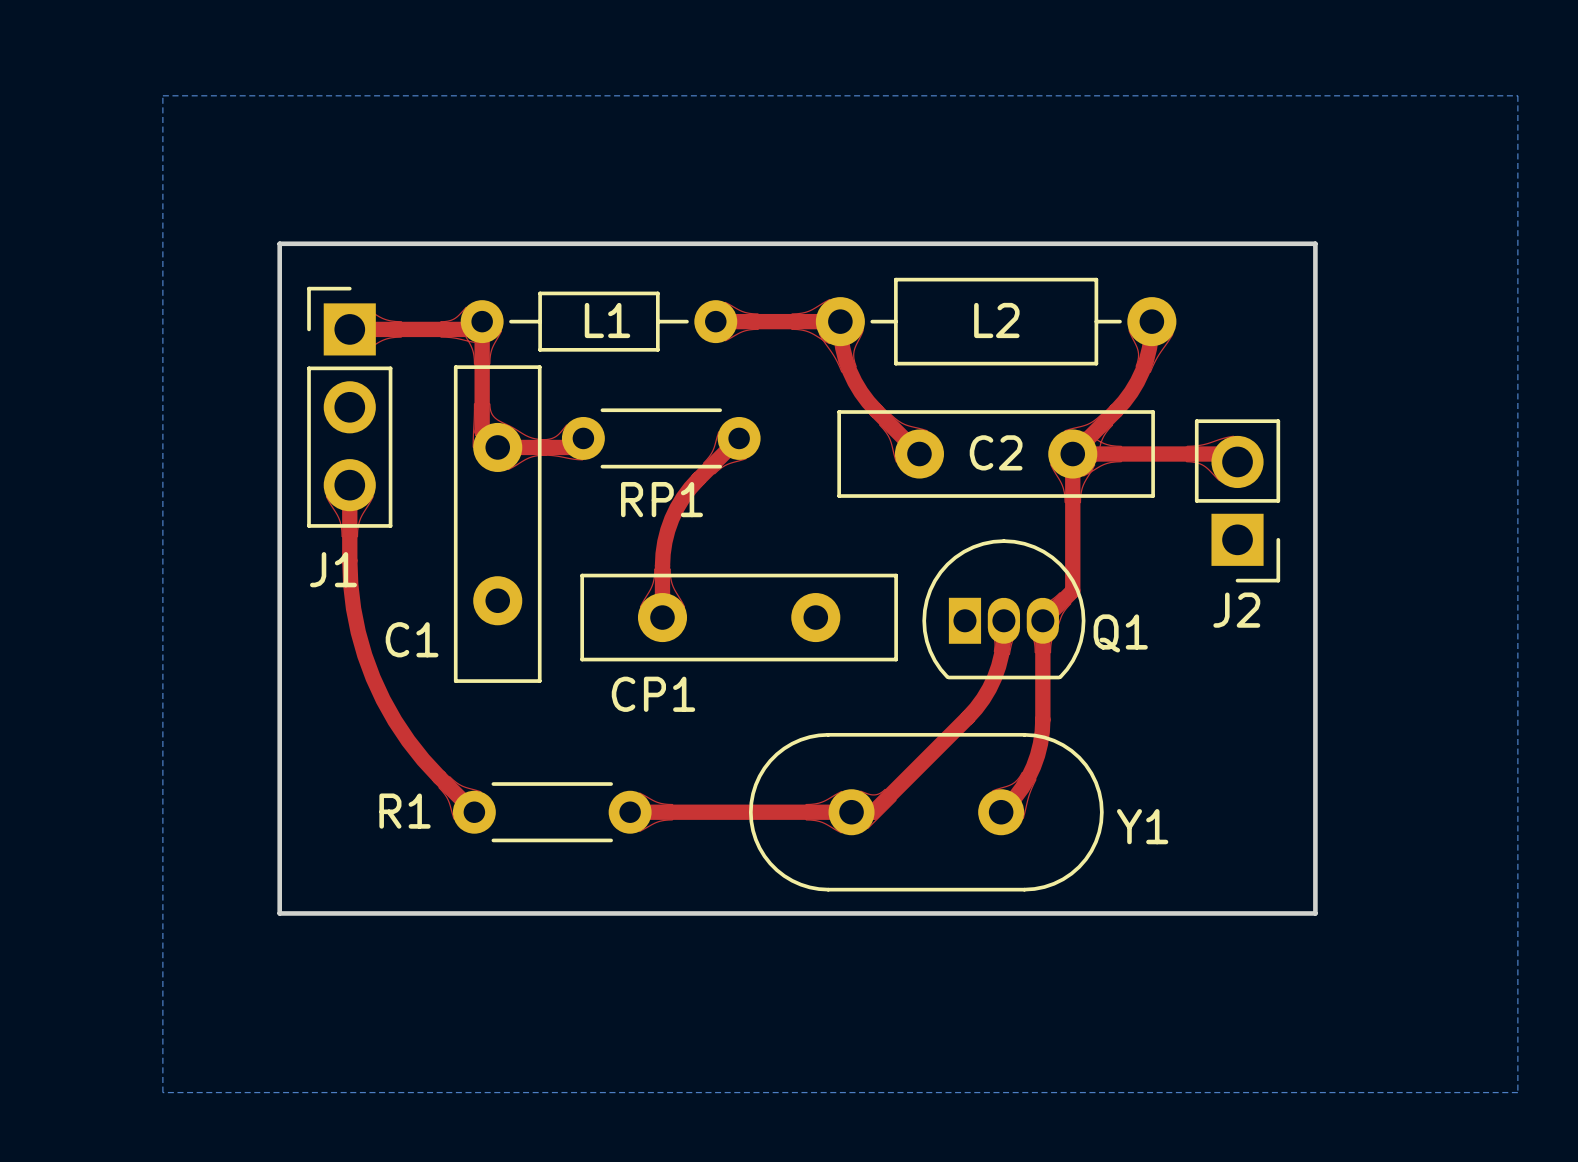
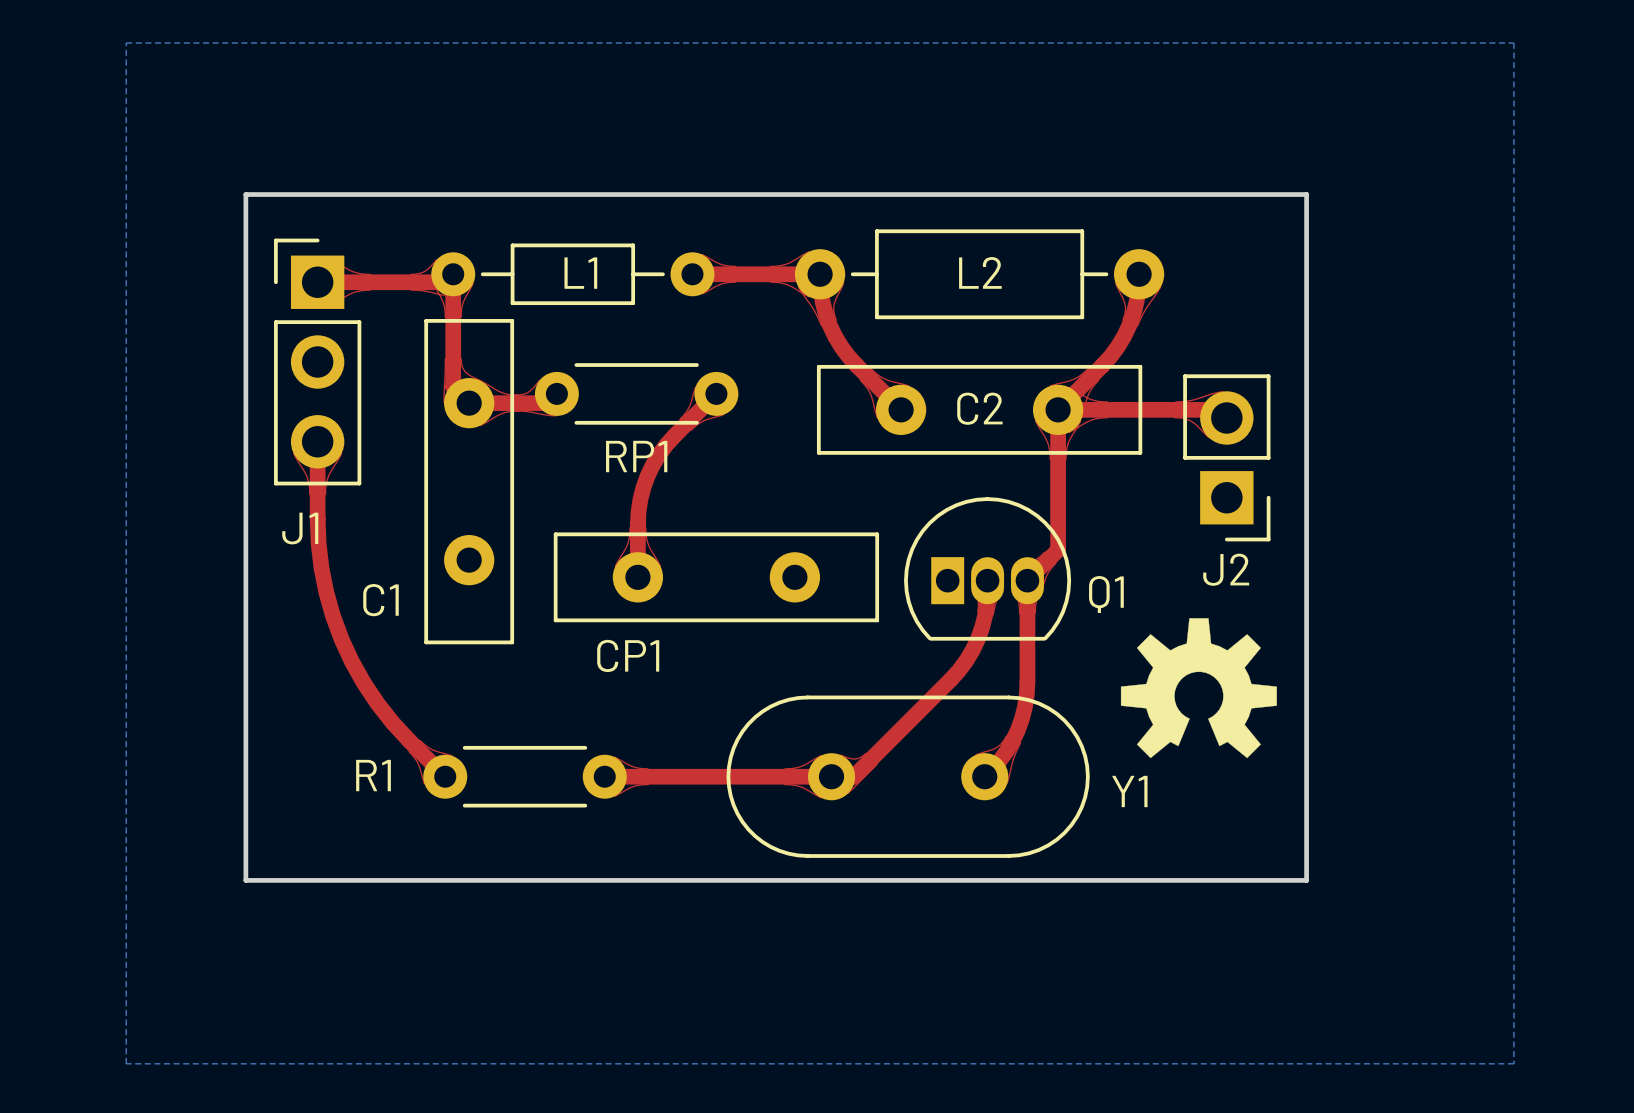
drawing: none -> [1120, 618, 1277, 759]

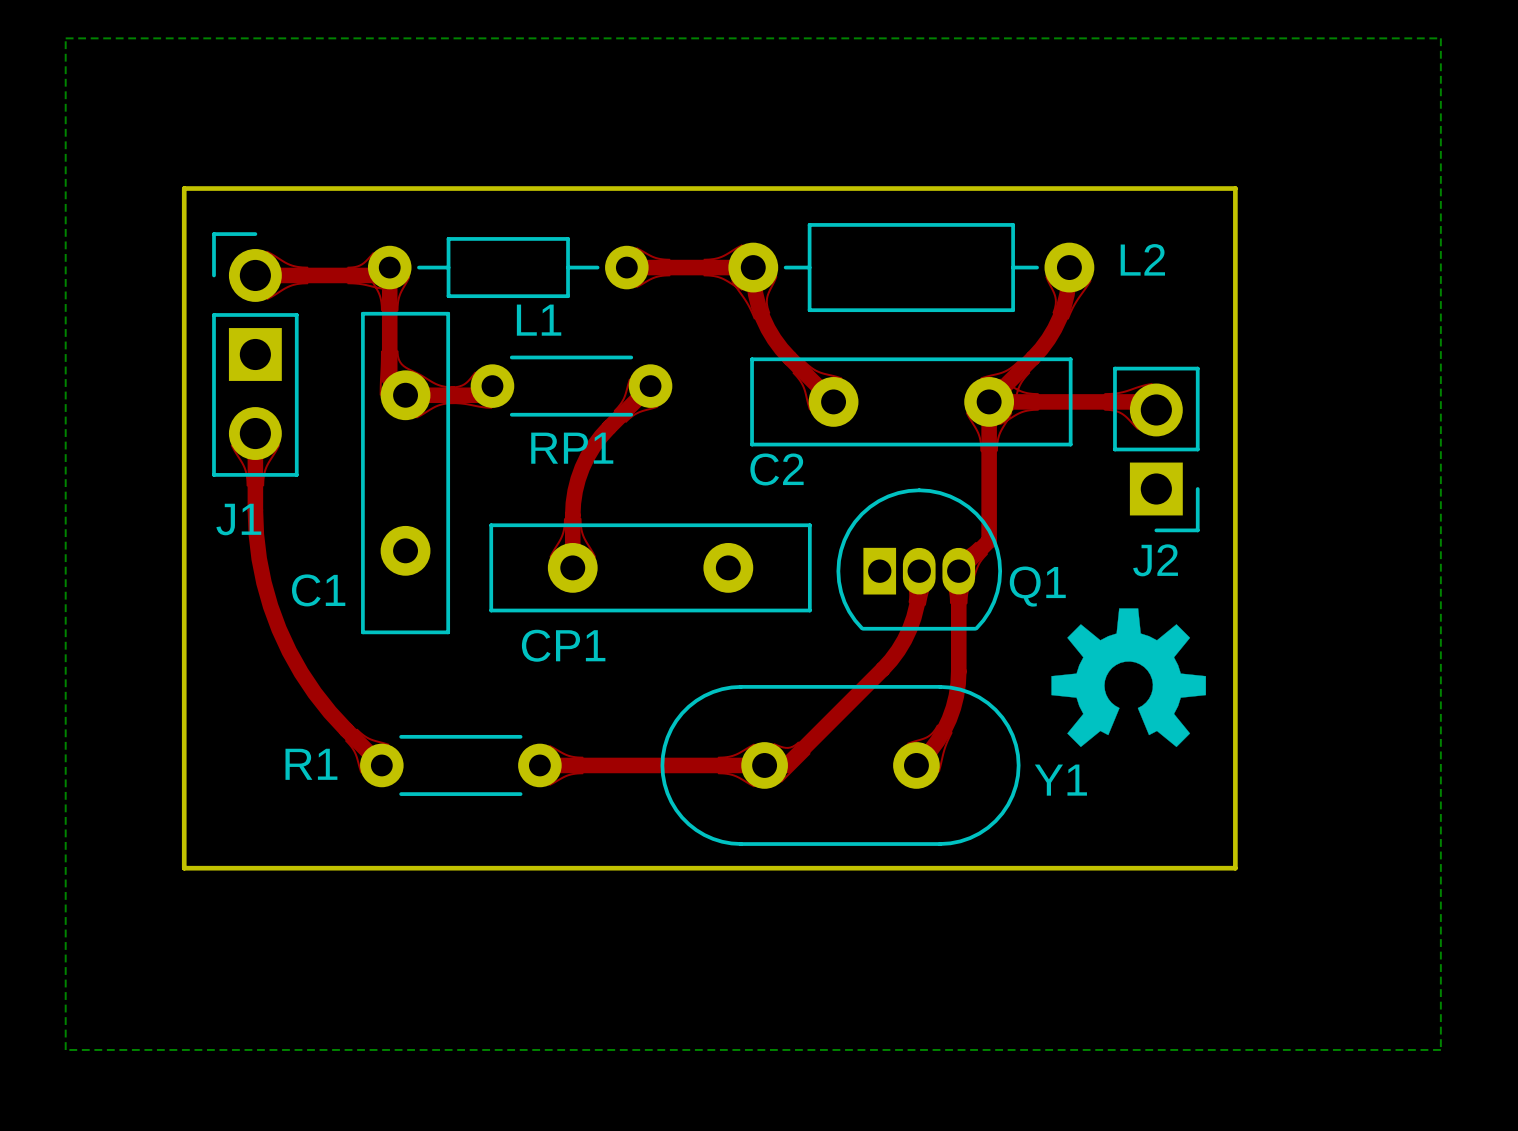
J1 footprint: [274, 238, 362, 486] -> [212, 232, 299, 477]
L2 name position: L2 (980, 272) -> L2 (1142, 259)
L1 name position: L1 (580, 273) -> L1 (539, 320)
C2 name position: C2 (979, 408) -> C2 (777, 469)

